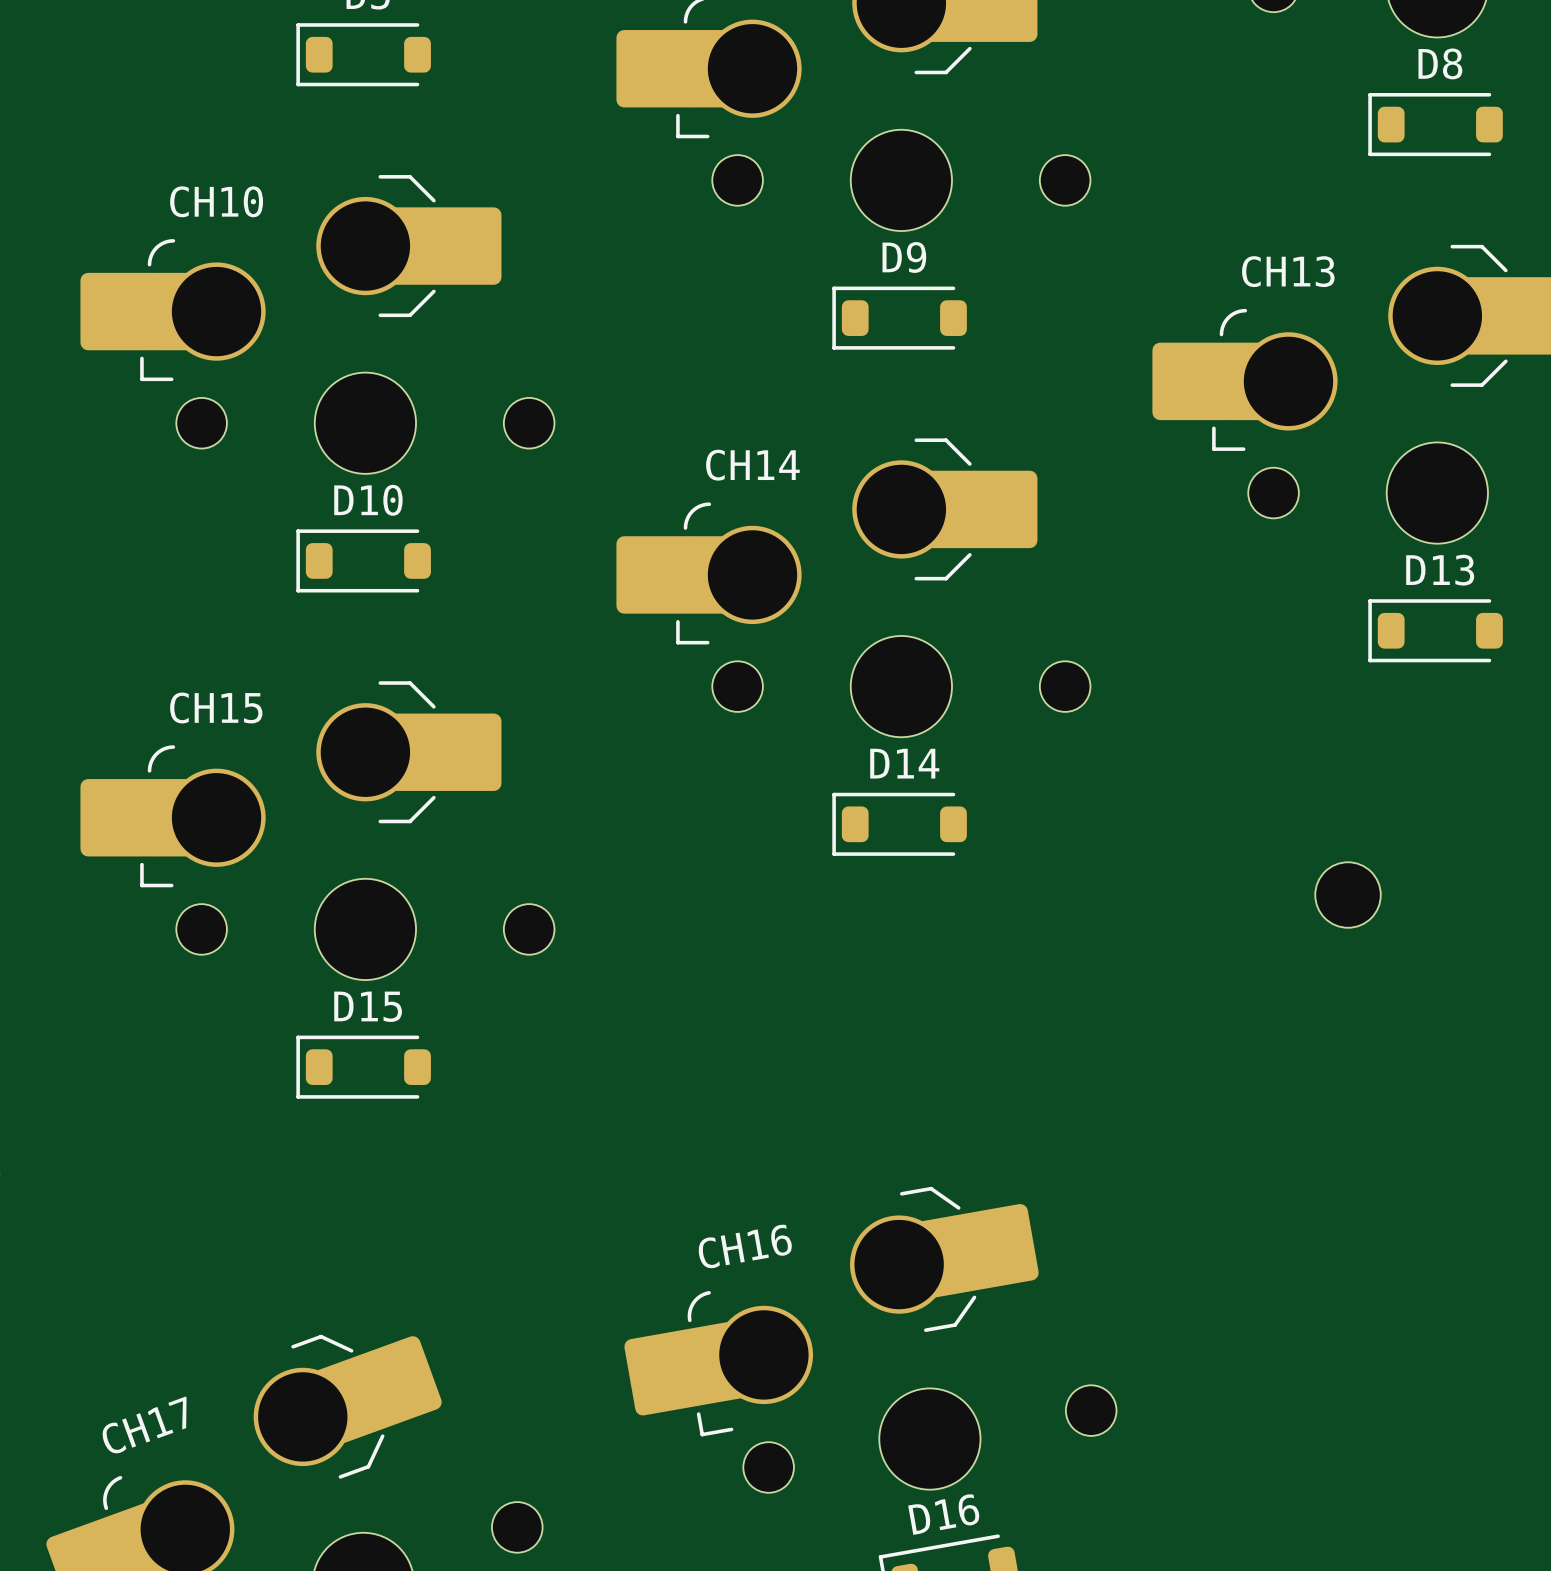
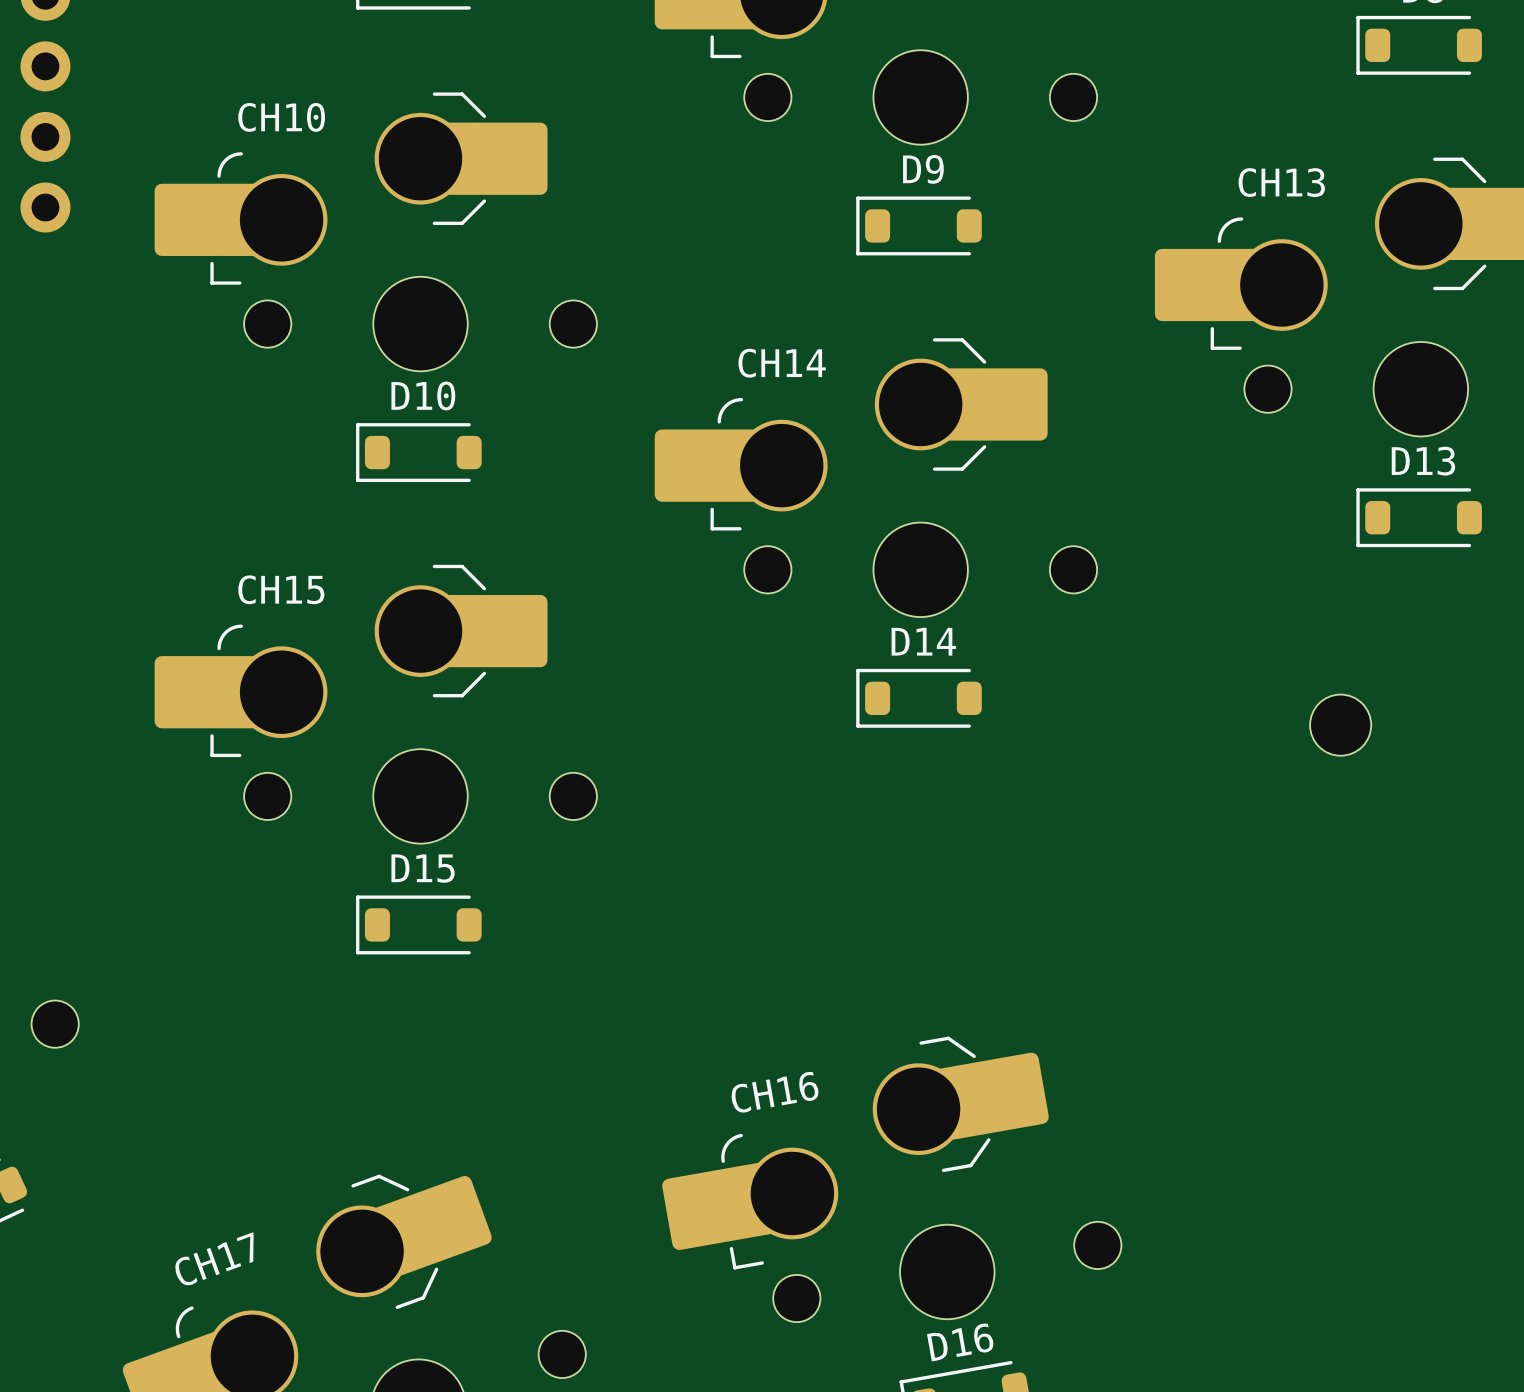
part position: (1348, 895) -> (1340, 725)

